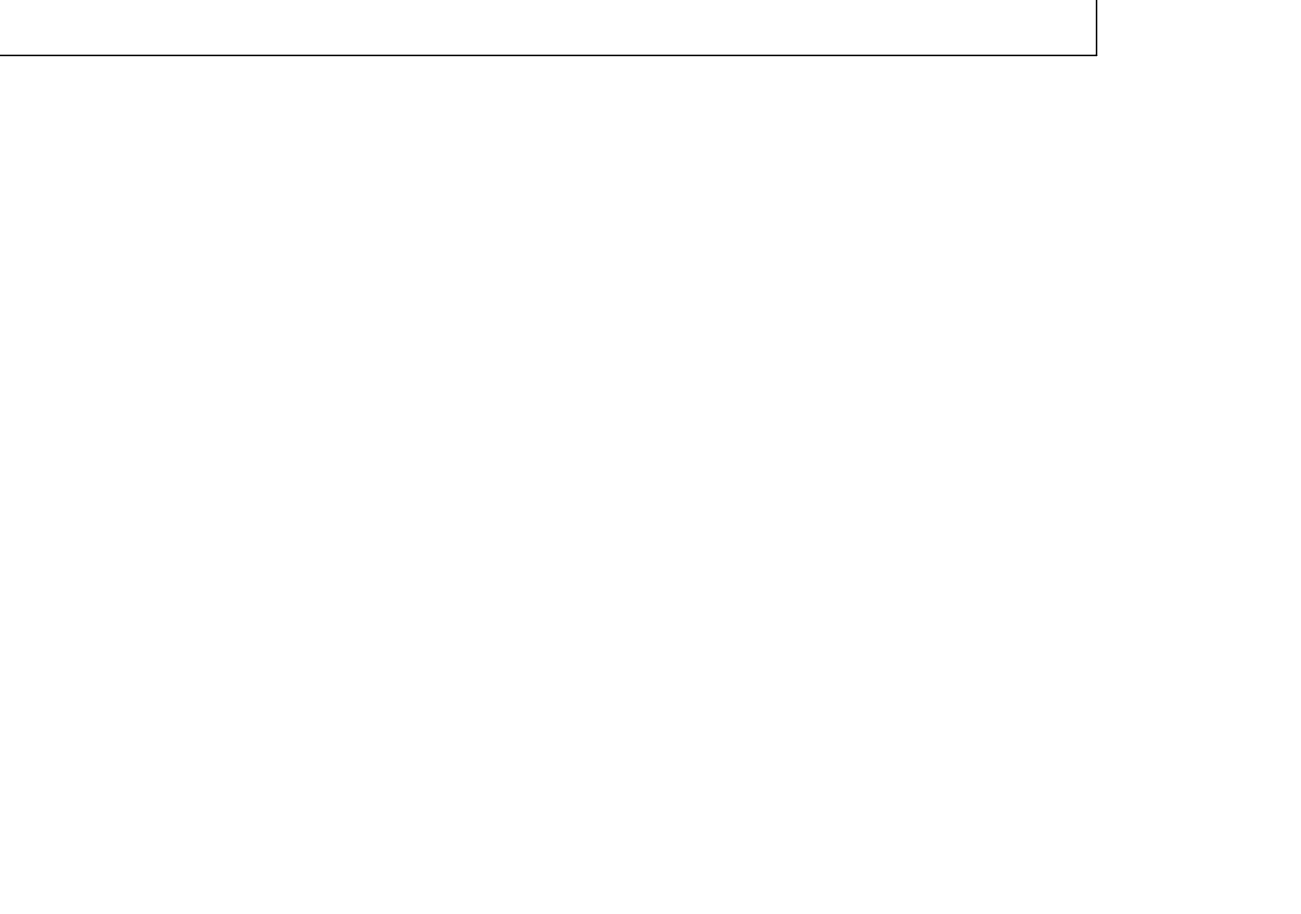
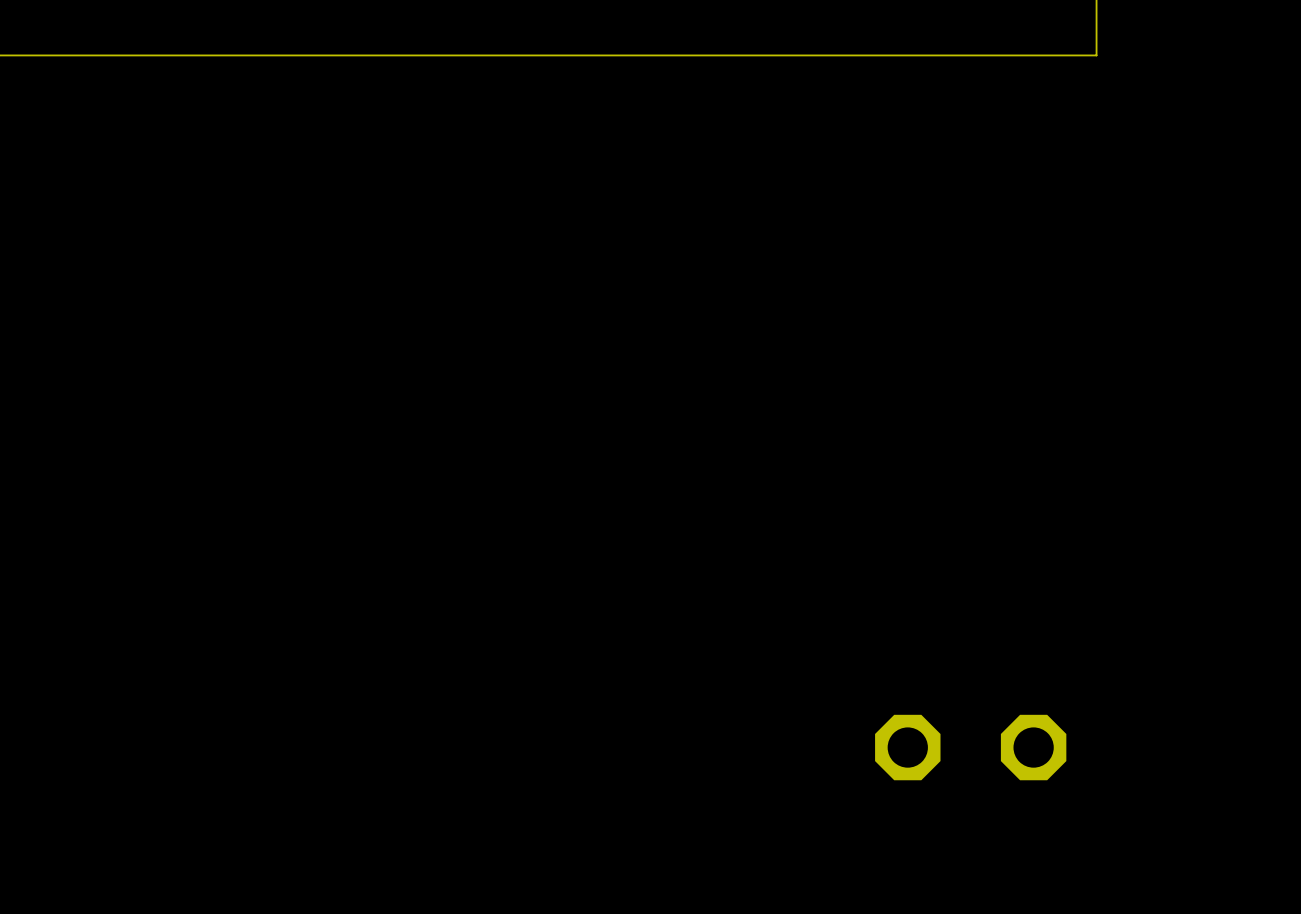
part: none -> (970, 747)

